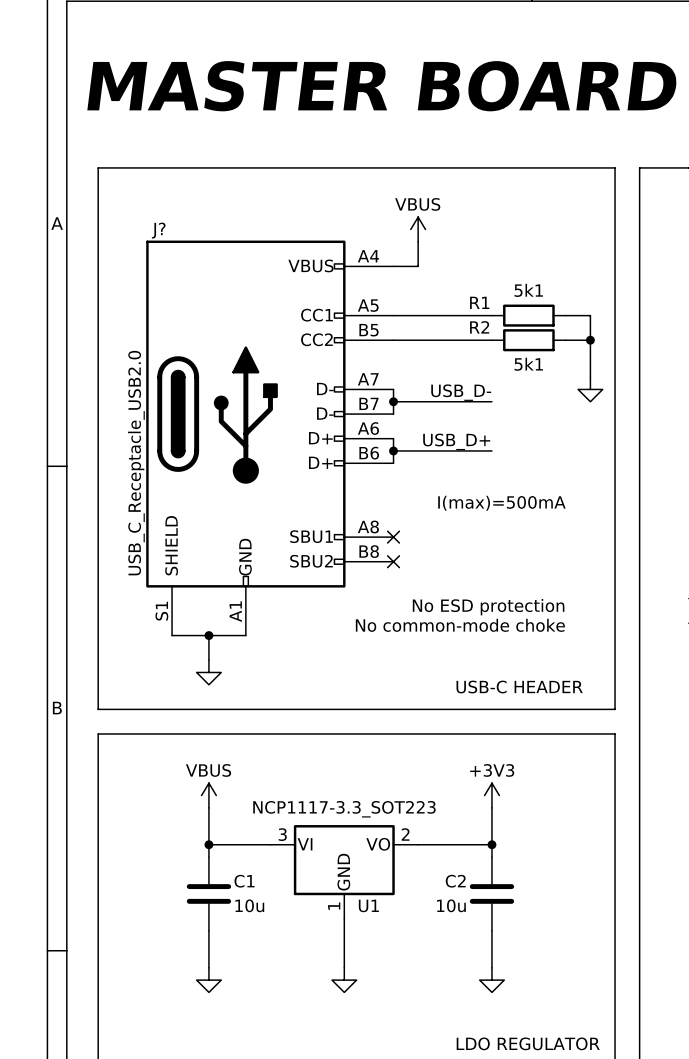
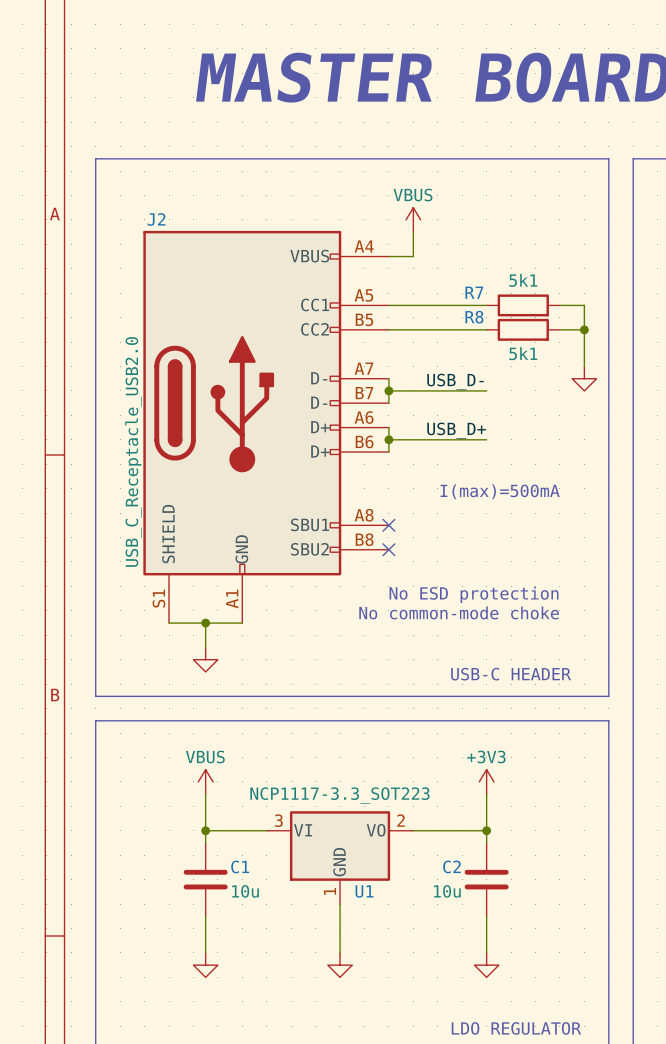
J? name: J? (158, 230) -> J2 (156, 219)
R1 name: R1 (479, 302) -> R7 (474, 292)
R2 name: R2 (479, 327) -> R8 (474, 317)

